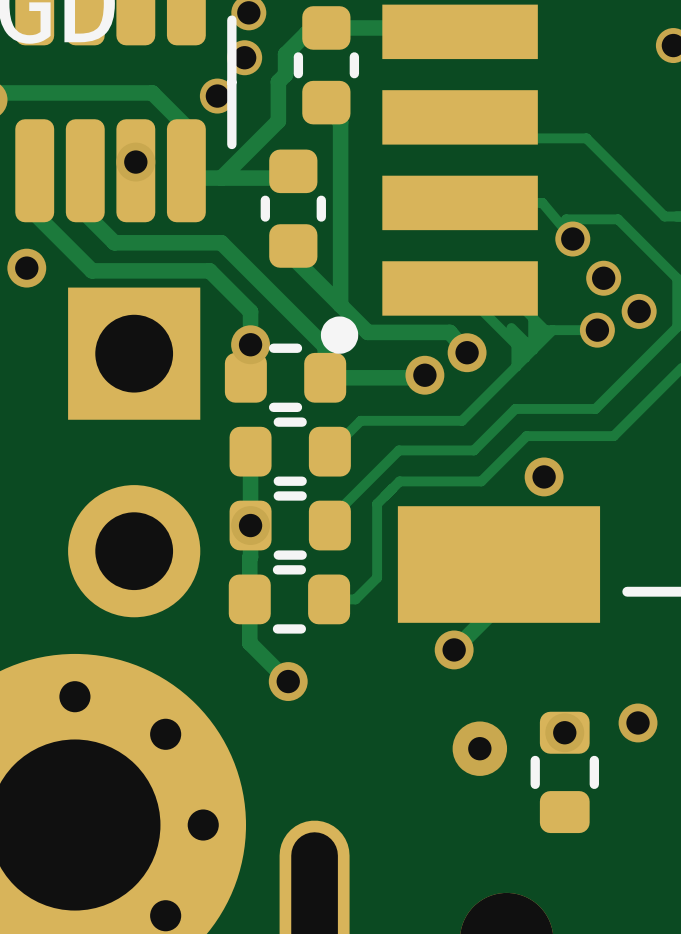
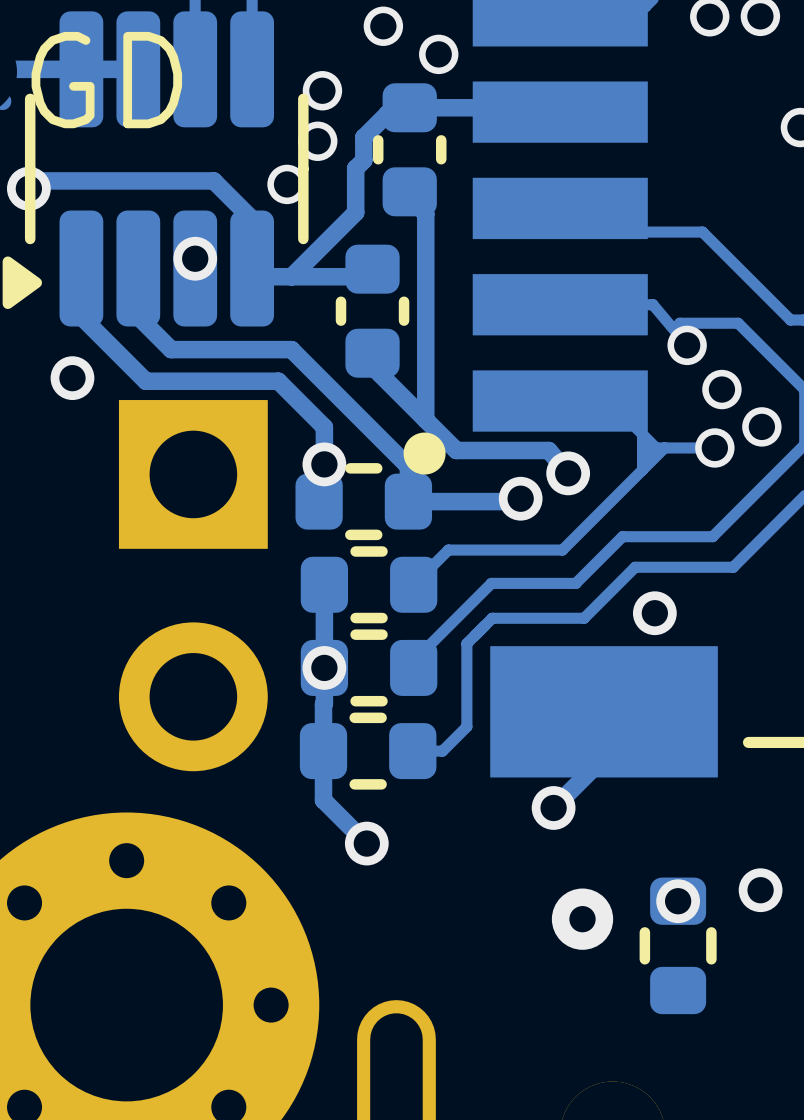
track: (460, 288) (516, 344) (516, 366) -> none
track: (511, 327) (525, 341) (525, 357) -> none

